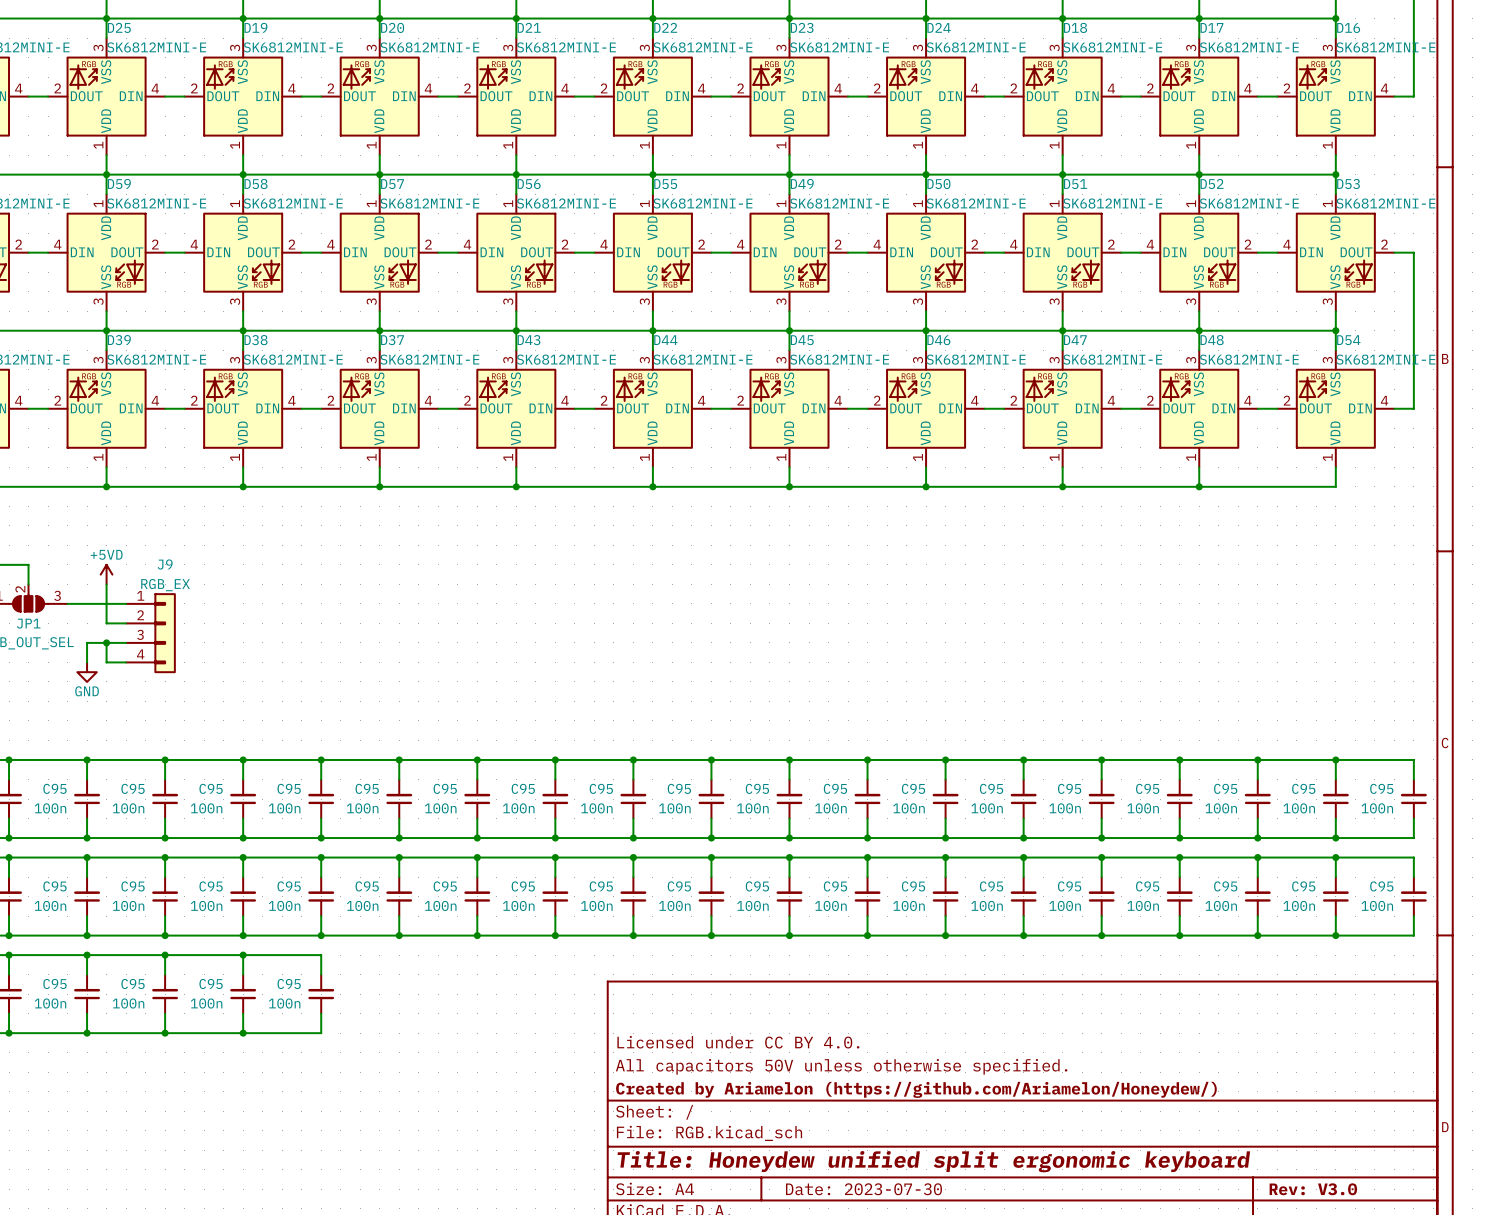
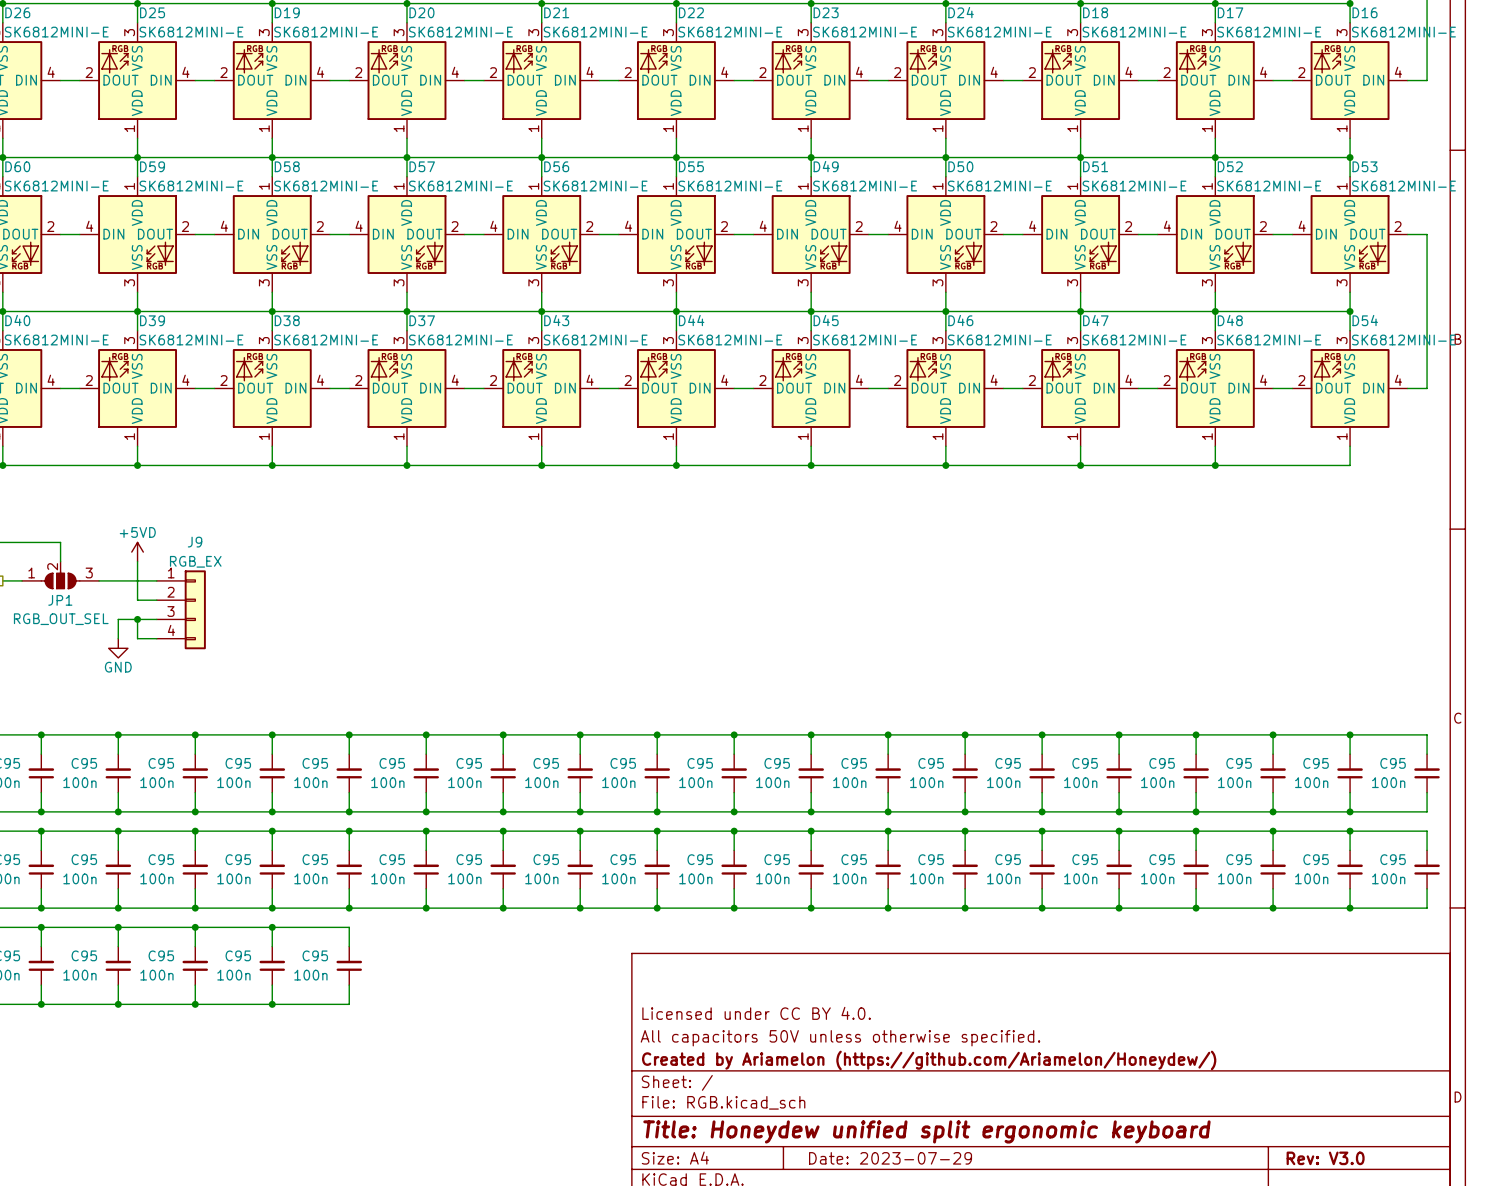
title block: Date: 2023-07-30 (863, 1189) -> Date: 2023-07-29 (890, 1158)

